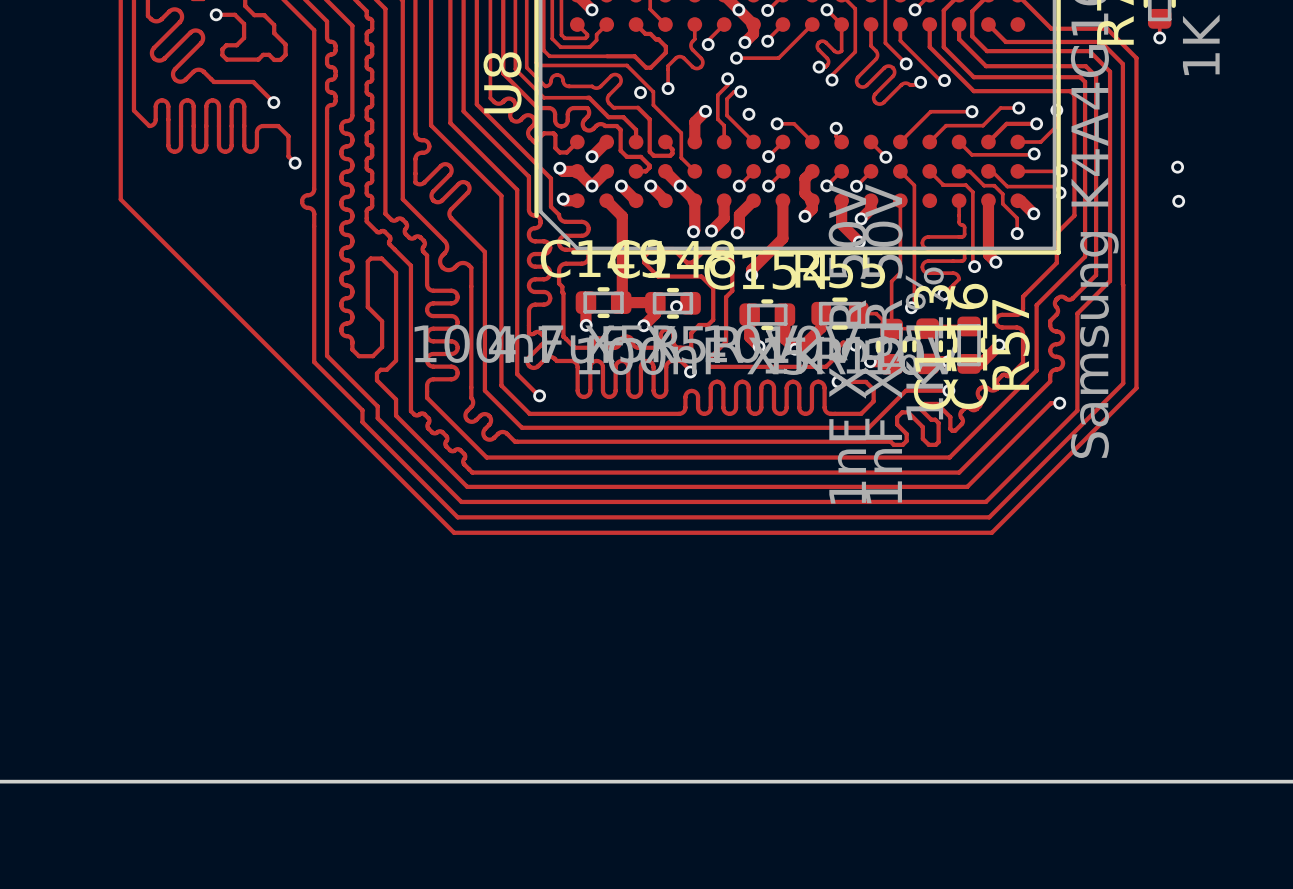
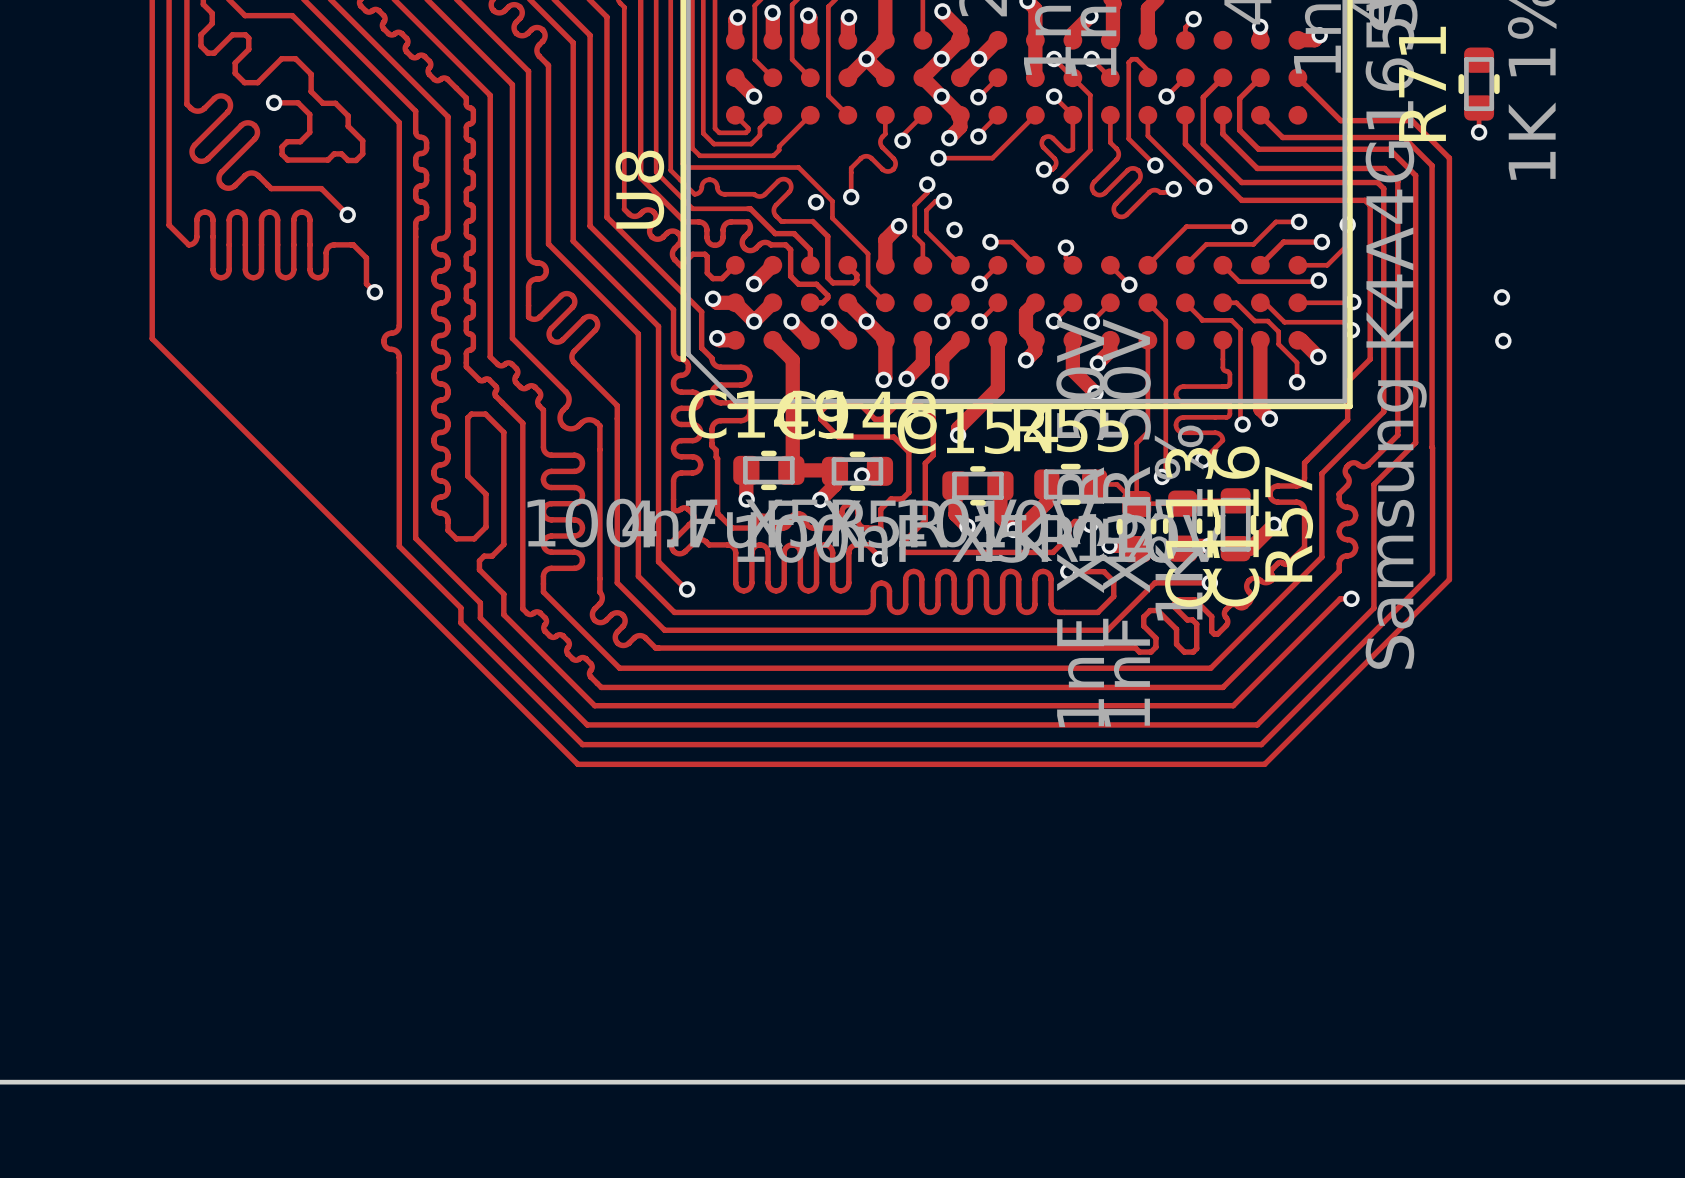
track: (636, 24) (645, 33) (650, 33) (658, 39) (665, 46) (665, 52) (650, 67) (646, 67) (634, 56) (607, 56) -> (810, 115) (779, 146) (779, 150) (773, 155)

